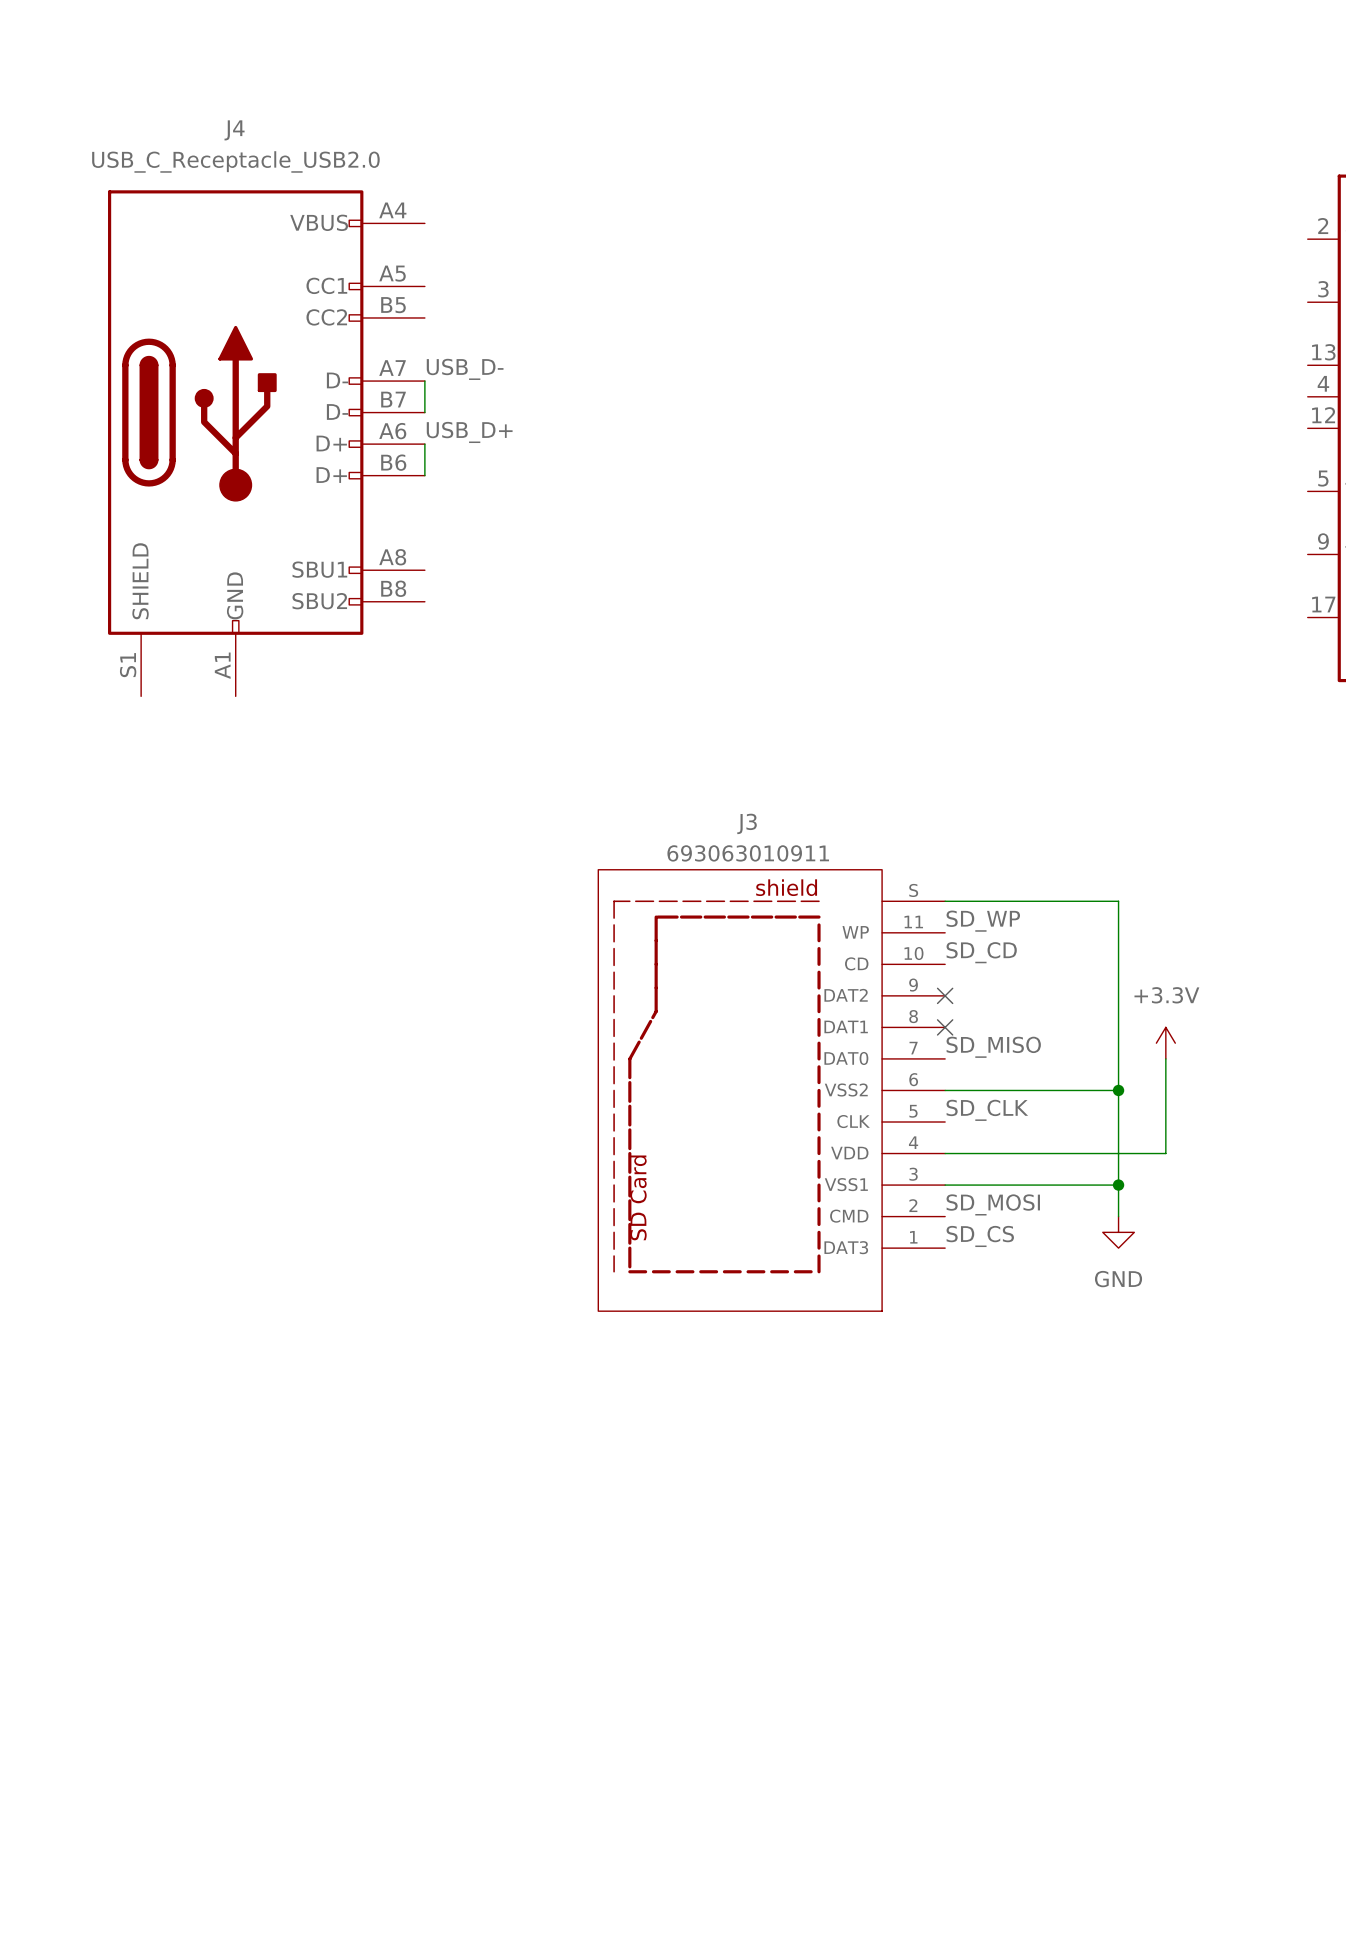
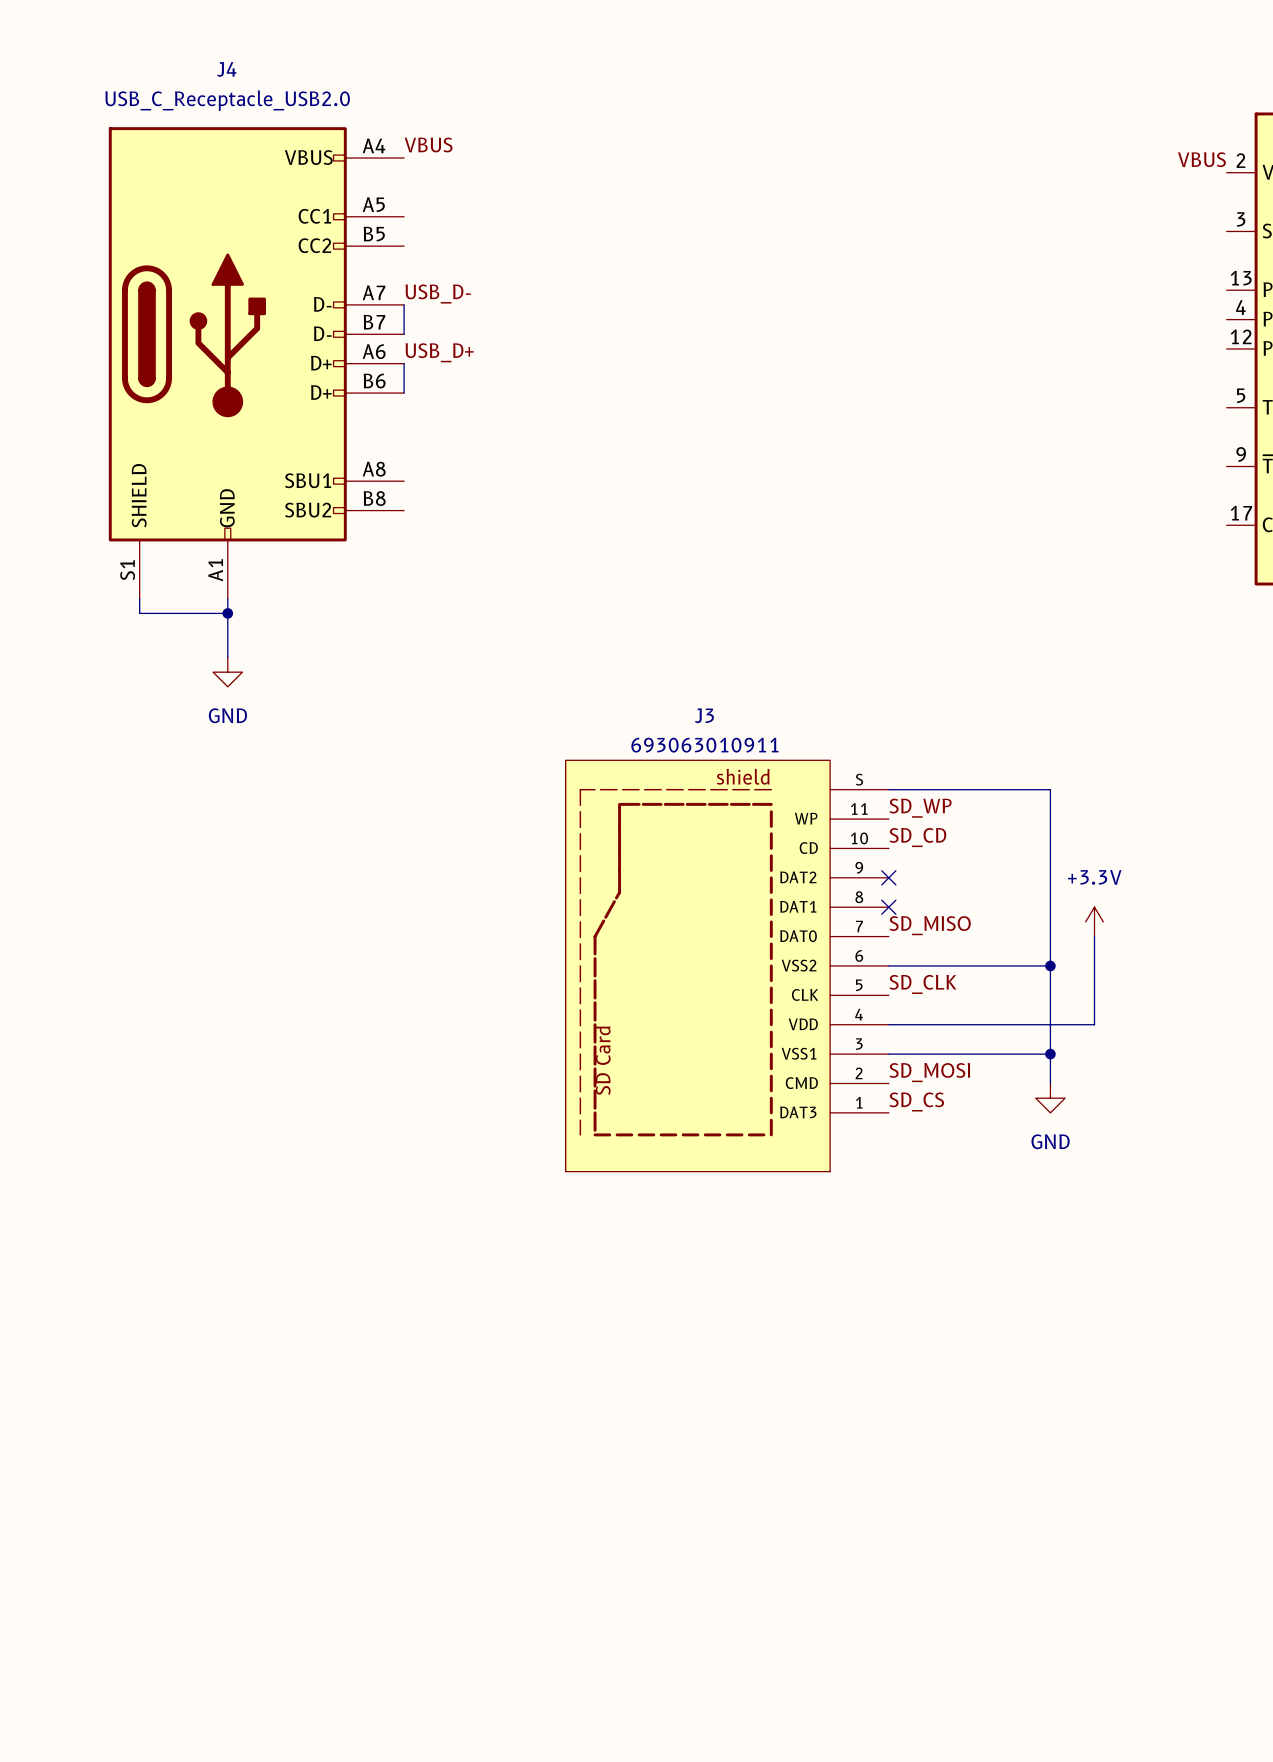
label: none -> VBUS (428, 145)
label: none -> VBUS (1201, 159)
wire: none -> (139, 598) (139, 613) (227, 613)
wire: none -> (227, 598) (227, 657)
junction: none -> (227, 613)
power symbol: none -> GND (227, 672)

